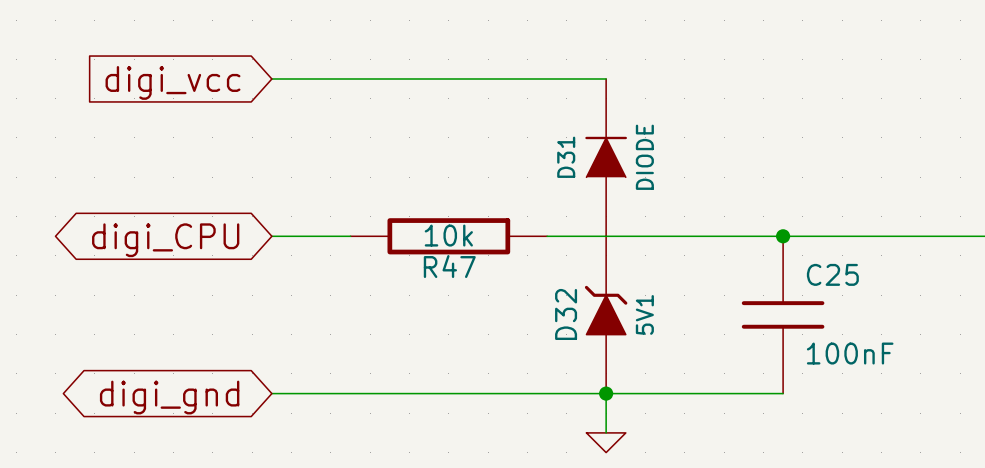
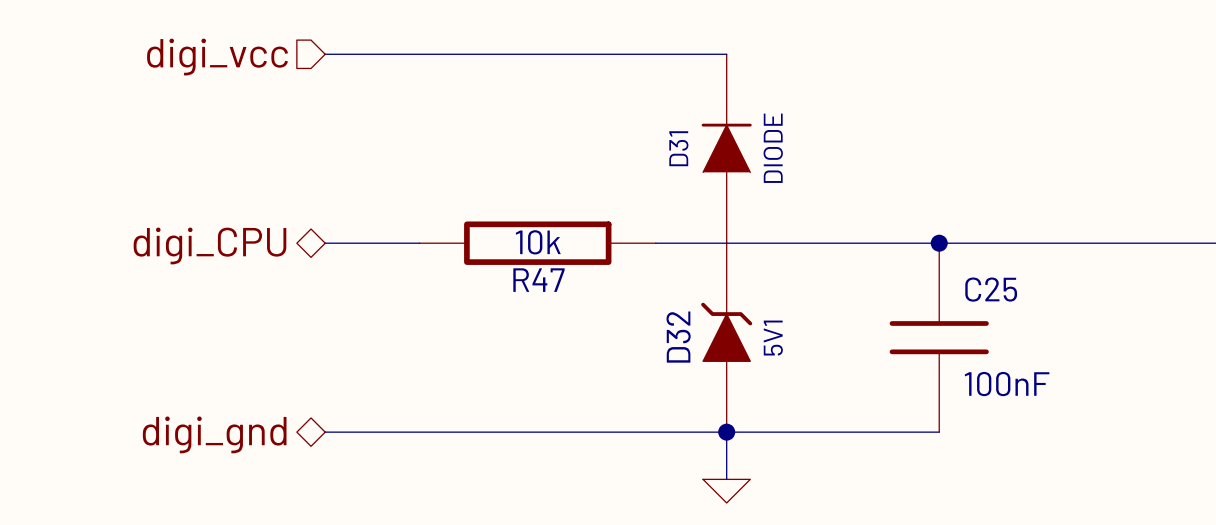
hierarchical label: none -> digi_vcc (217, 57)
global label: digi_vcc (172, 82) -> none
hierarchical label: none -> digi_CPU (209, 245)
global label: digi_CPU (165, 240) -> none
hierarchical label: none -> digi_gnd (214, 434)
global label: digi_gnd (169, 397) -> none

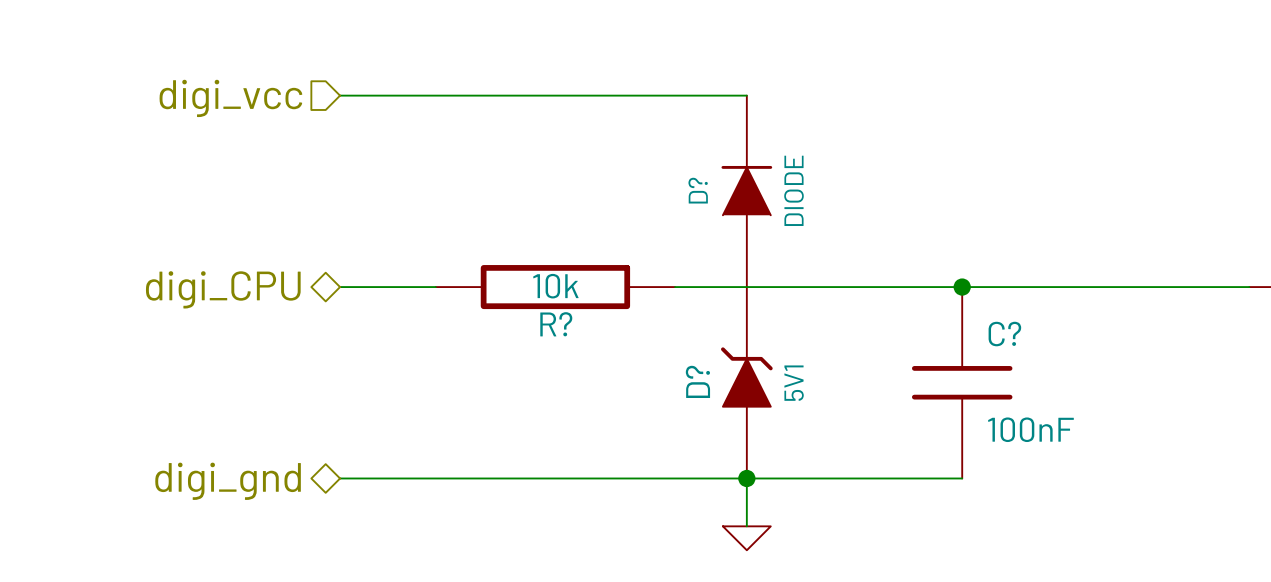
D31 name: D31 (678, 148) -> D? (698, 190)
R47 name: R47 (538, 280) -> R? (556, 324)
C25 name: C25 (991, 289) -> C? (1004, 334)
D32 name: D32 (678, 337) -> D? (697, 381)

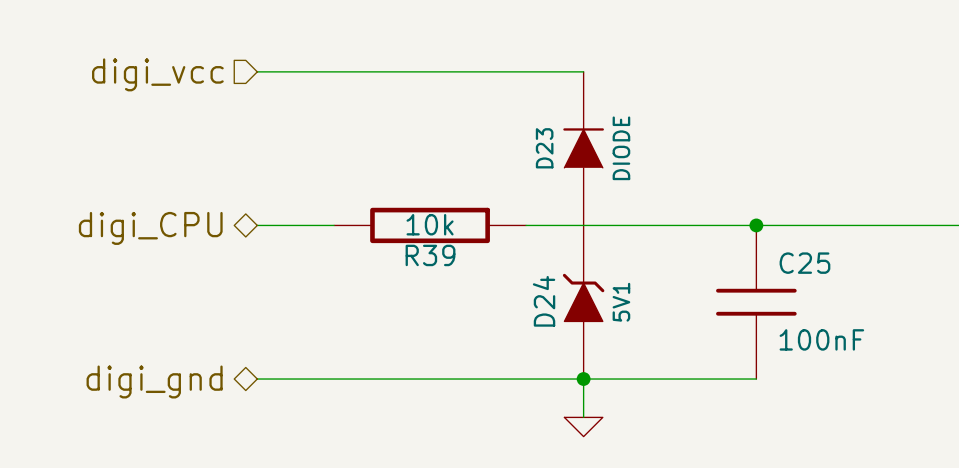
D? name: D? (698, 190) -> D23 (544, 148)
R? name: R? (556, 324) -> R39 (430, 255)
C? name: C? (1004, 334) -> C25 (804, 263)
D? name: D? (697, 381) -> D24 (544, 301)

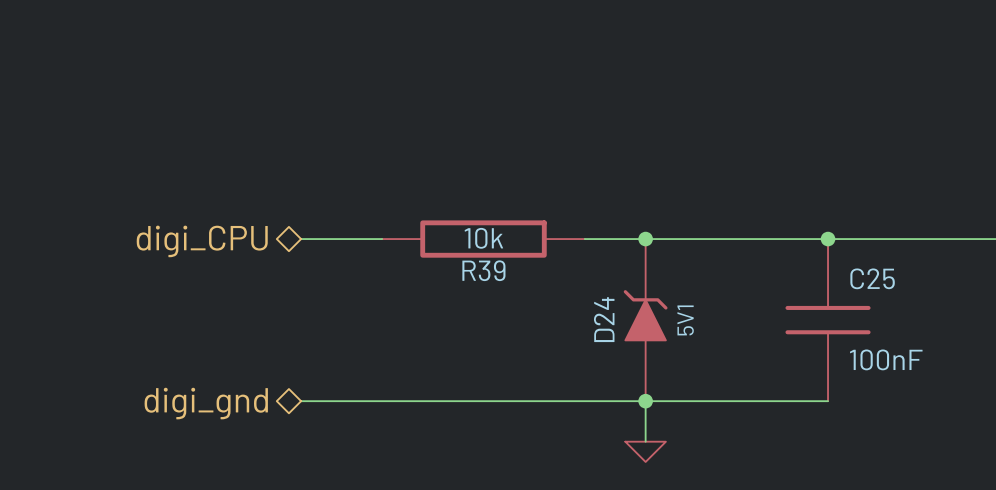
wire: (257, 71) (583, 71) -> none
hierarchical label: digi_vcc (157, 74) -> none
D23: DIODE (583, 148) -> none
junction: none -> (645, 239)

